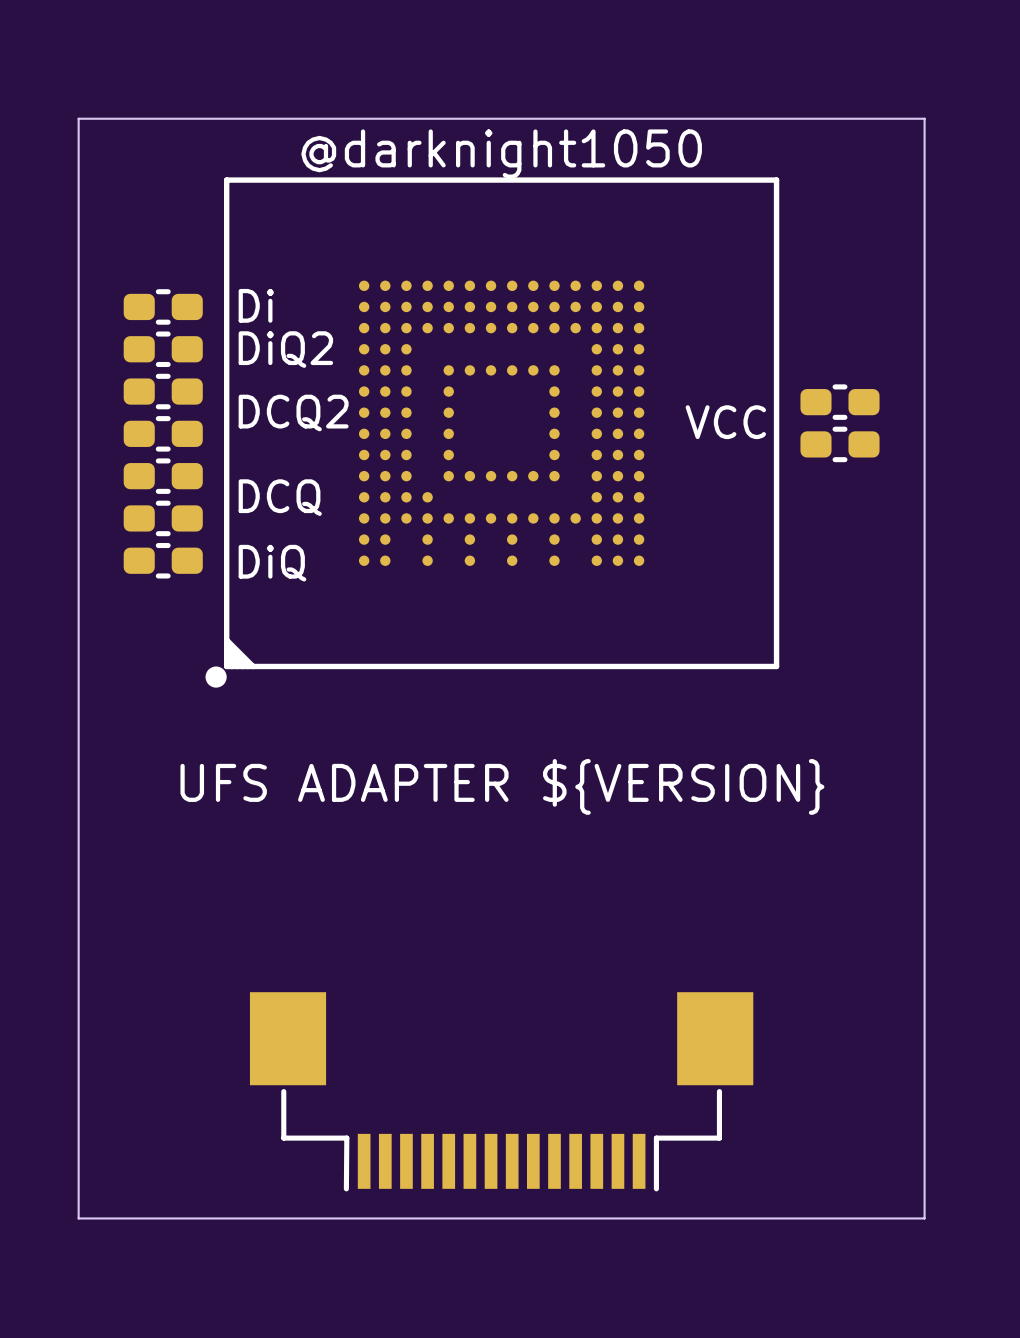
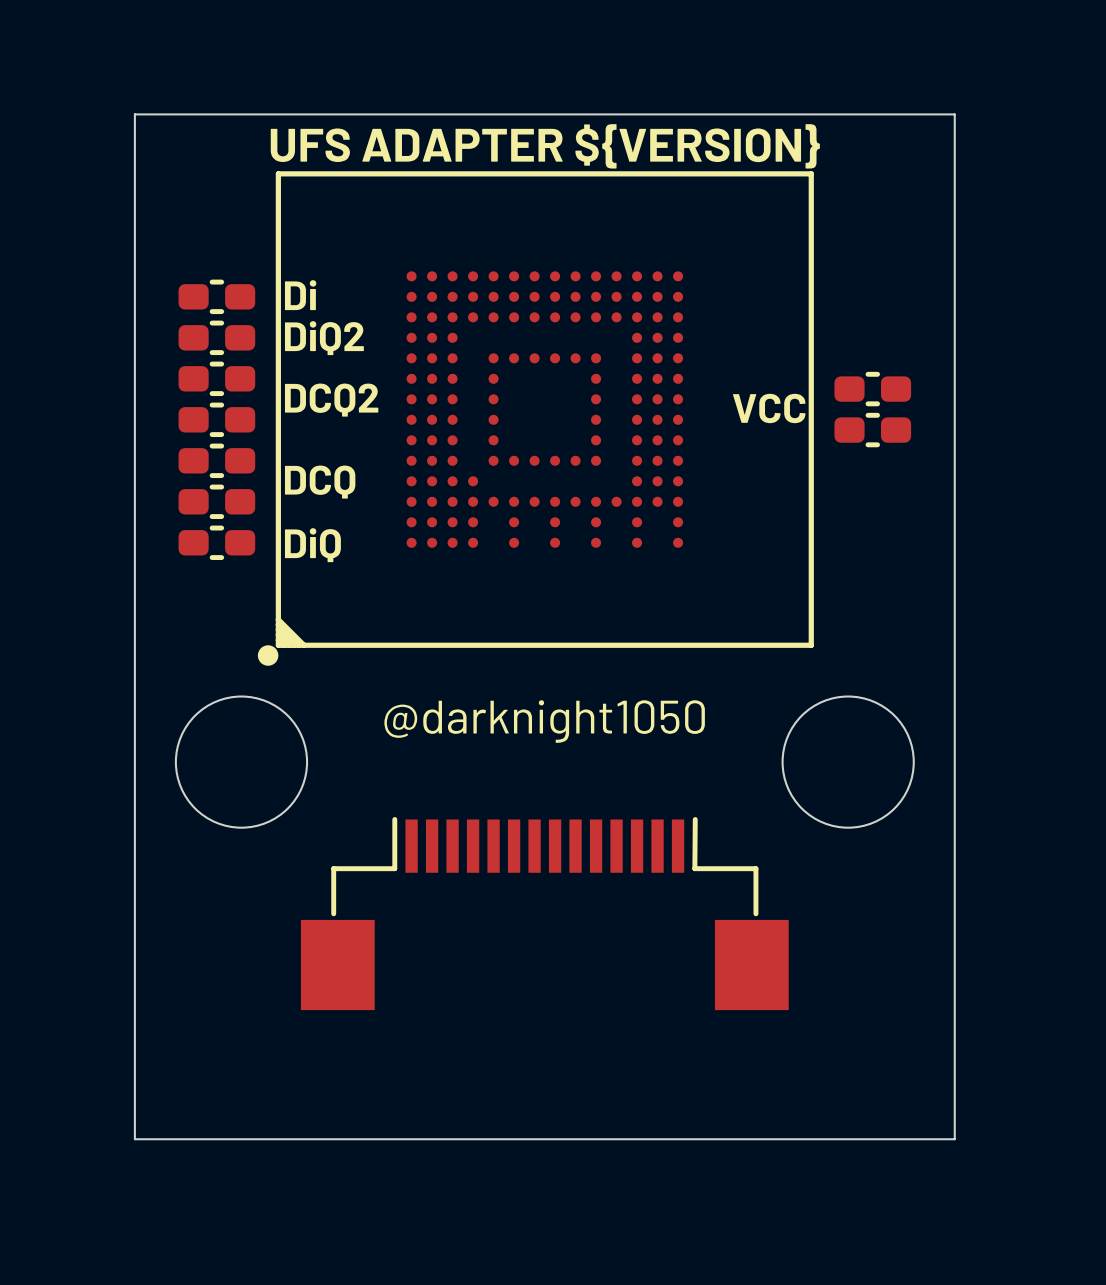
text: @darknight1050 (501, 154) -> UFS ADAPTER ${VERSION} (545, 146)
part footprint: [205, 177, 780, 688] -> [257, 171, 814, 666]
round board edge: none -> [174, 695, 309, 829]
round board edge: none -> [781, 695, 915, 829]
text: UFS ADAPTER ${VERSION} (502, 786) -> @darknight1050 (544, 721)
part rotation: 0° (501, 1091) -> 180° (544, 913)
board edge: (78, 1176) (78, 1218) (924, 1218) (924, 1176) -> (134, 1139) (954, 1139)

